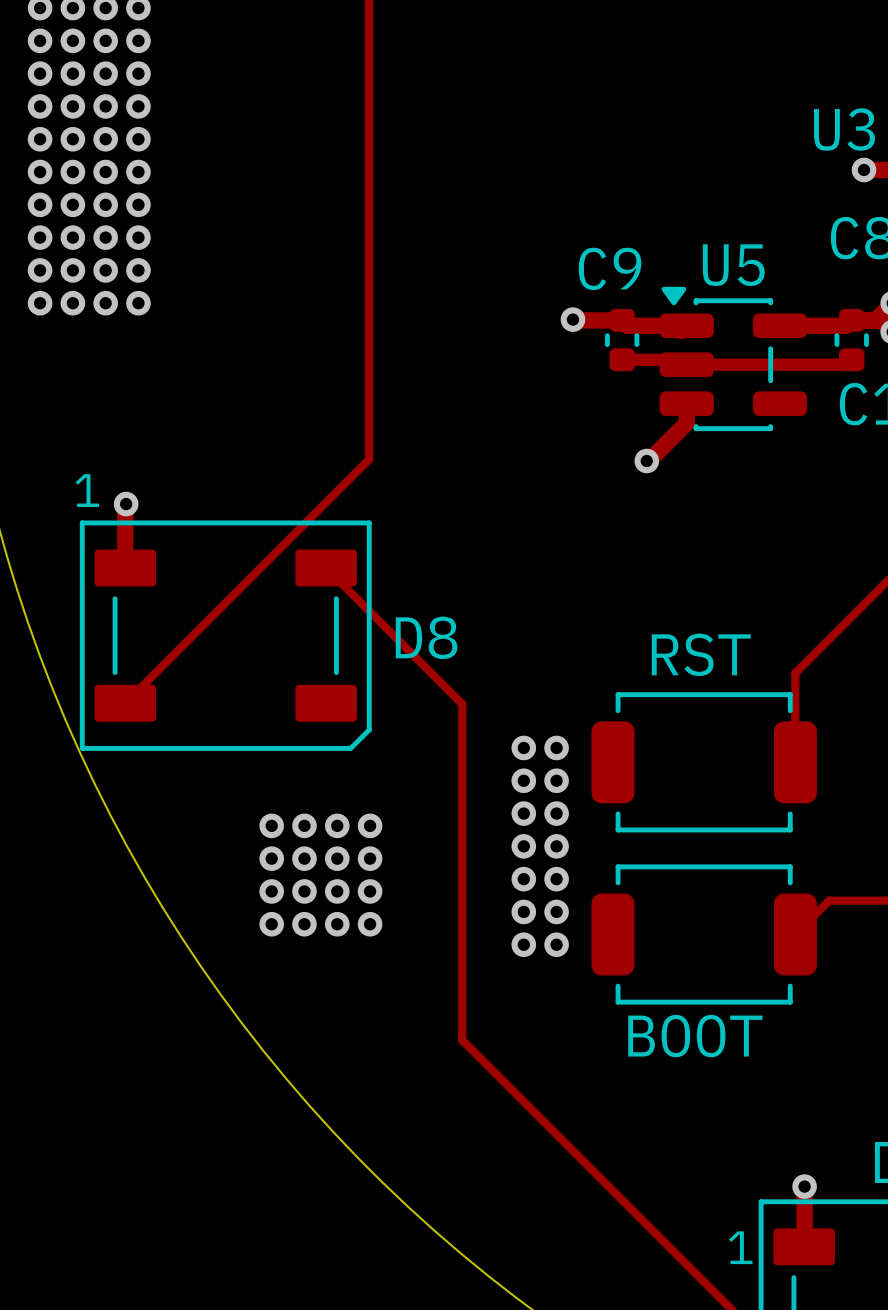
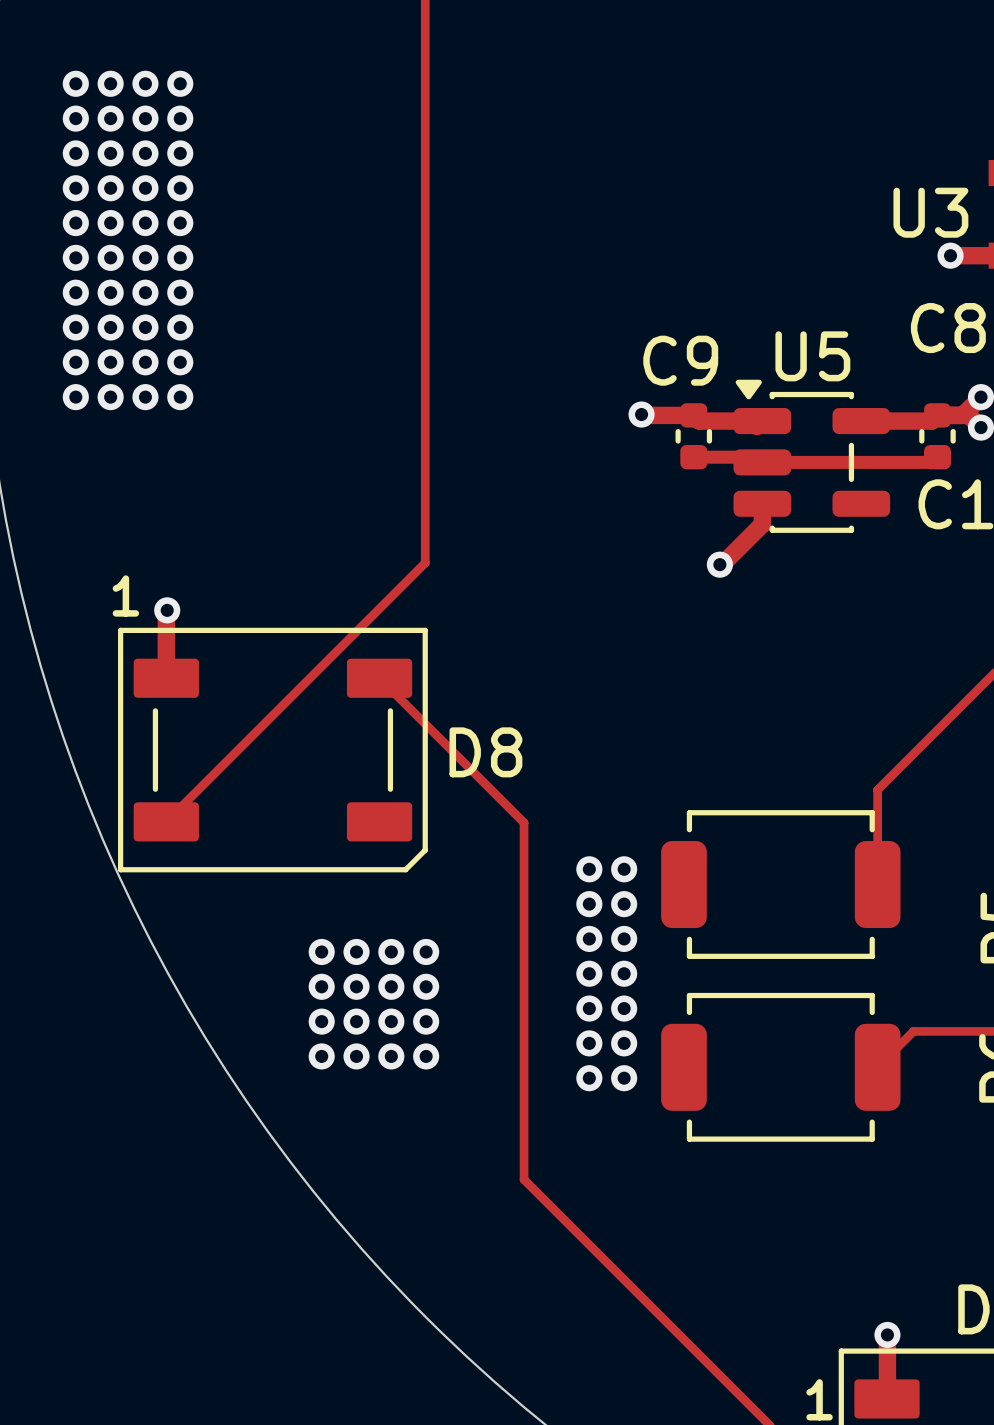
text: RST (701, 654) -> none
text: BOOT (695, 1036) -> none

